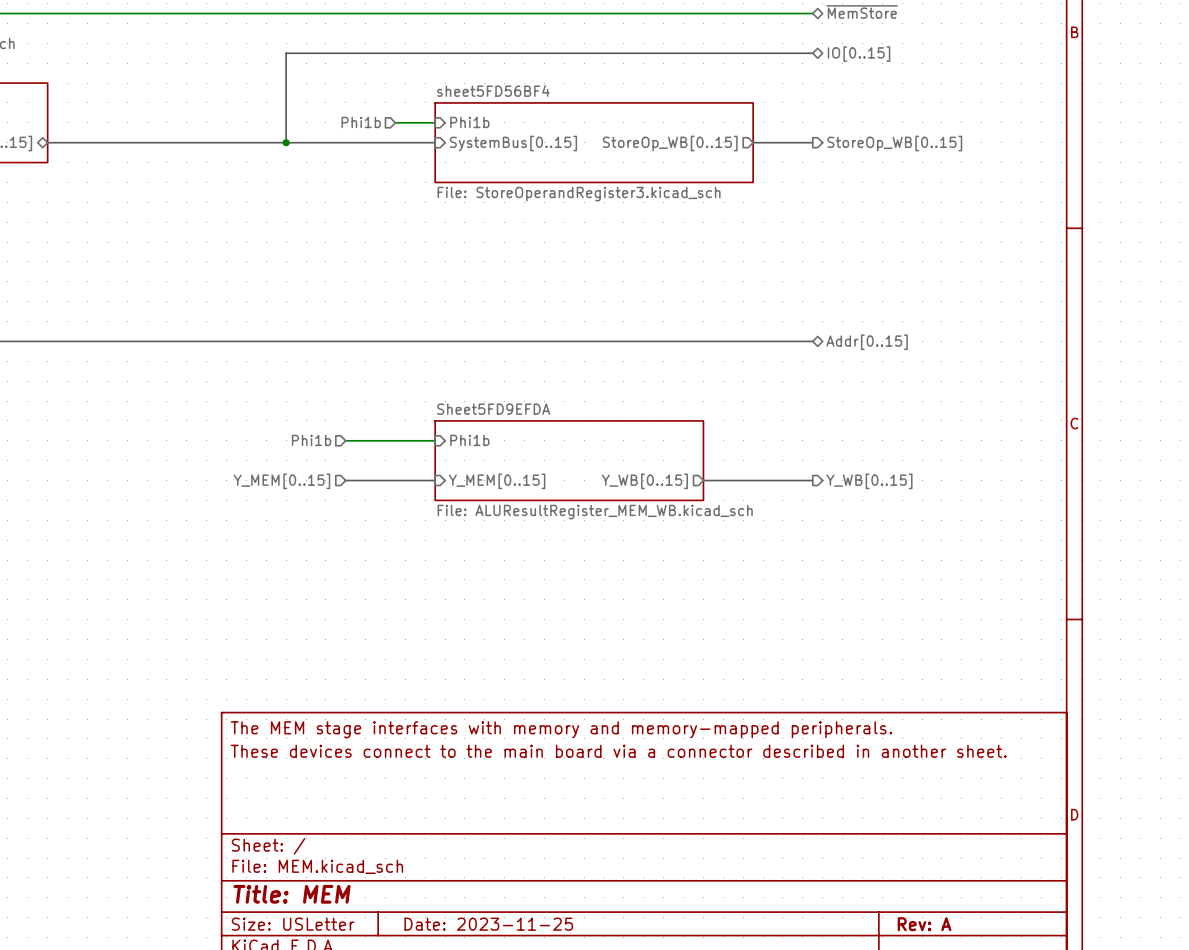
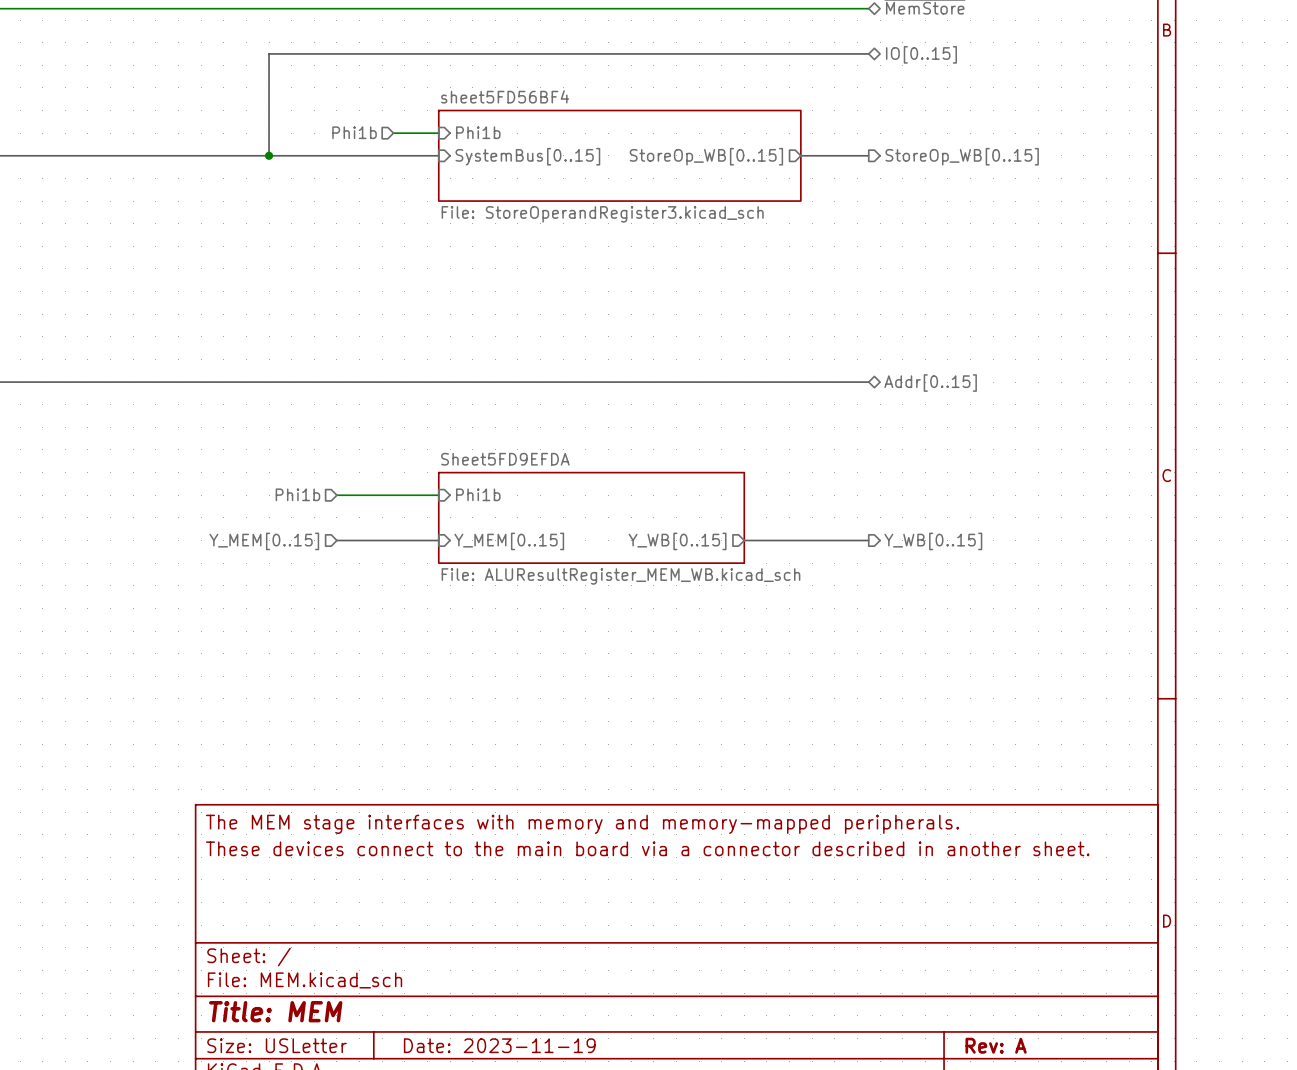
title block: Date: 2023-11-25 (488, 924) -> Date: 2023-11-19 (499, 1045)

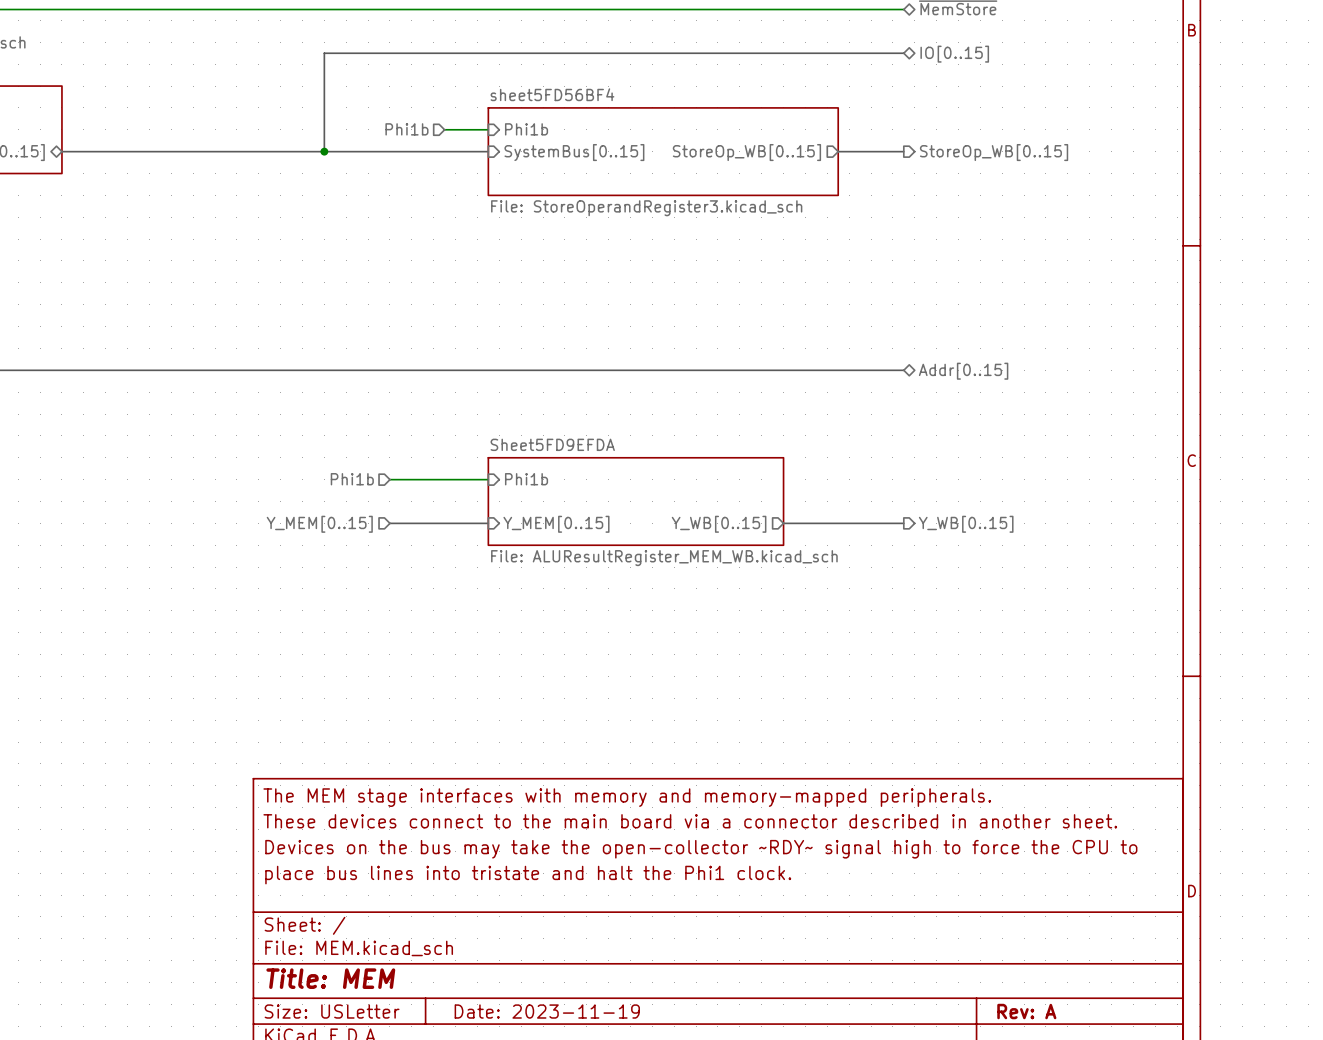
title block: none -> Devices on the bus may take the open-collector ~RDY~ signal high to force the CPU to (701, 849)
title block: none -> place bus lines into tristate and halt the Phi1 clock. (528, 875)

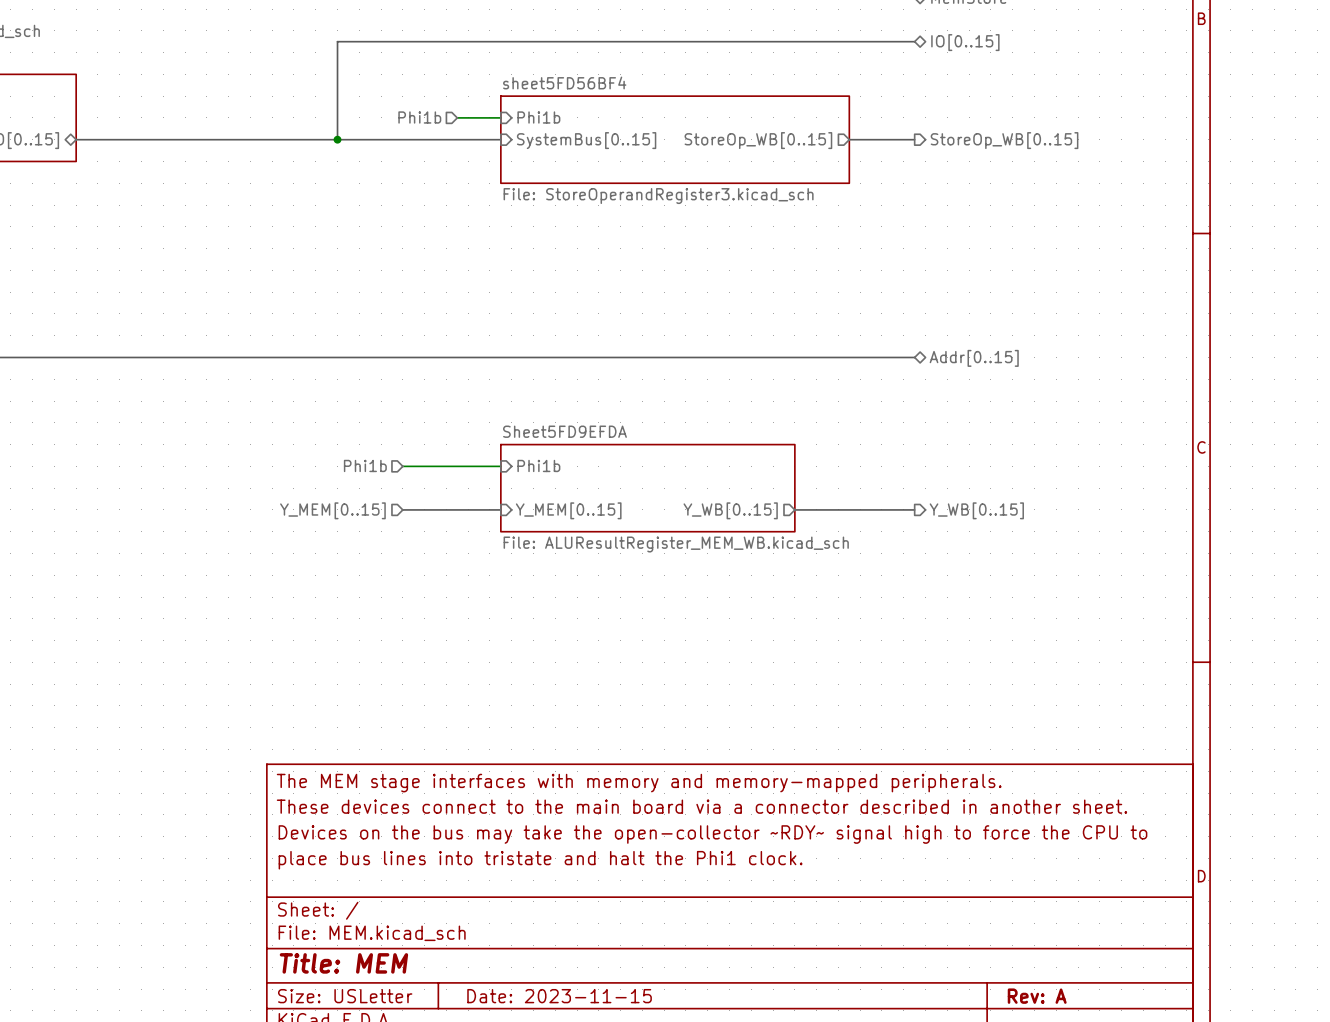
title block: Date: 2023-11-19 (547, 1011) -> Date: 2023-11-15 (559, 996)

